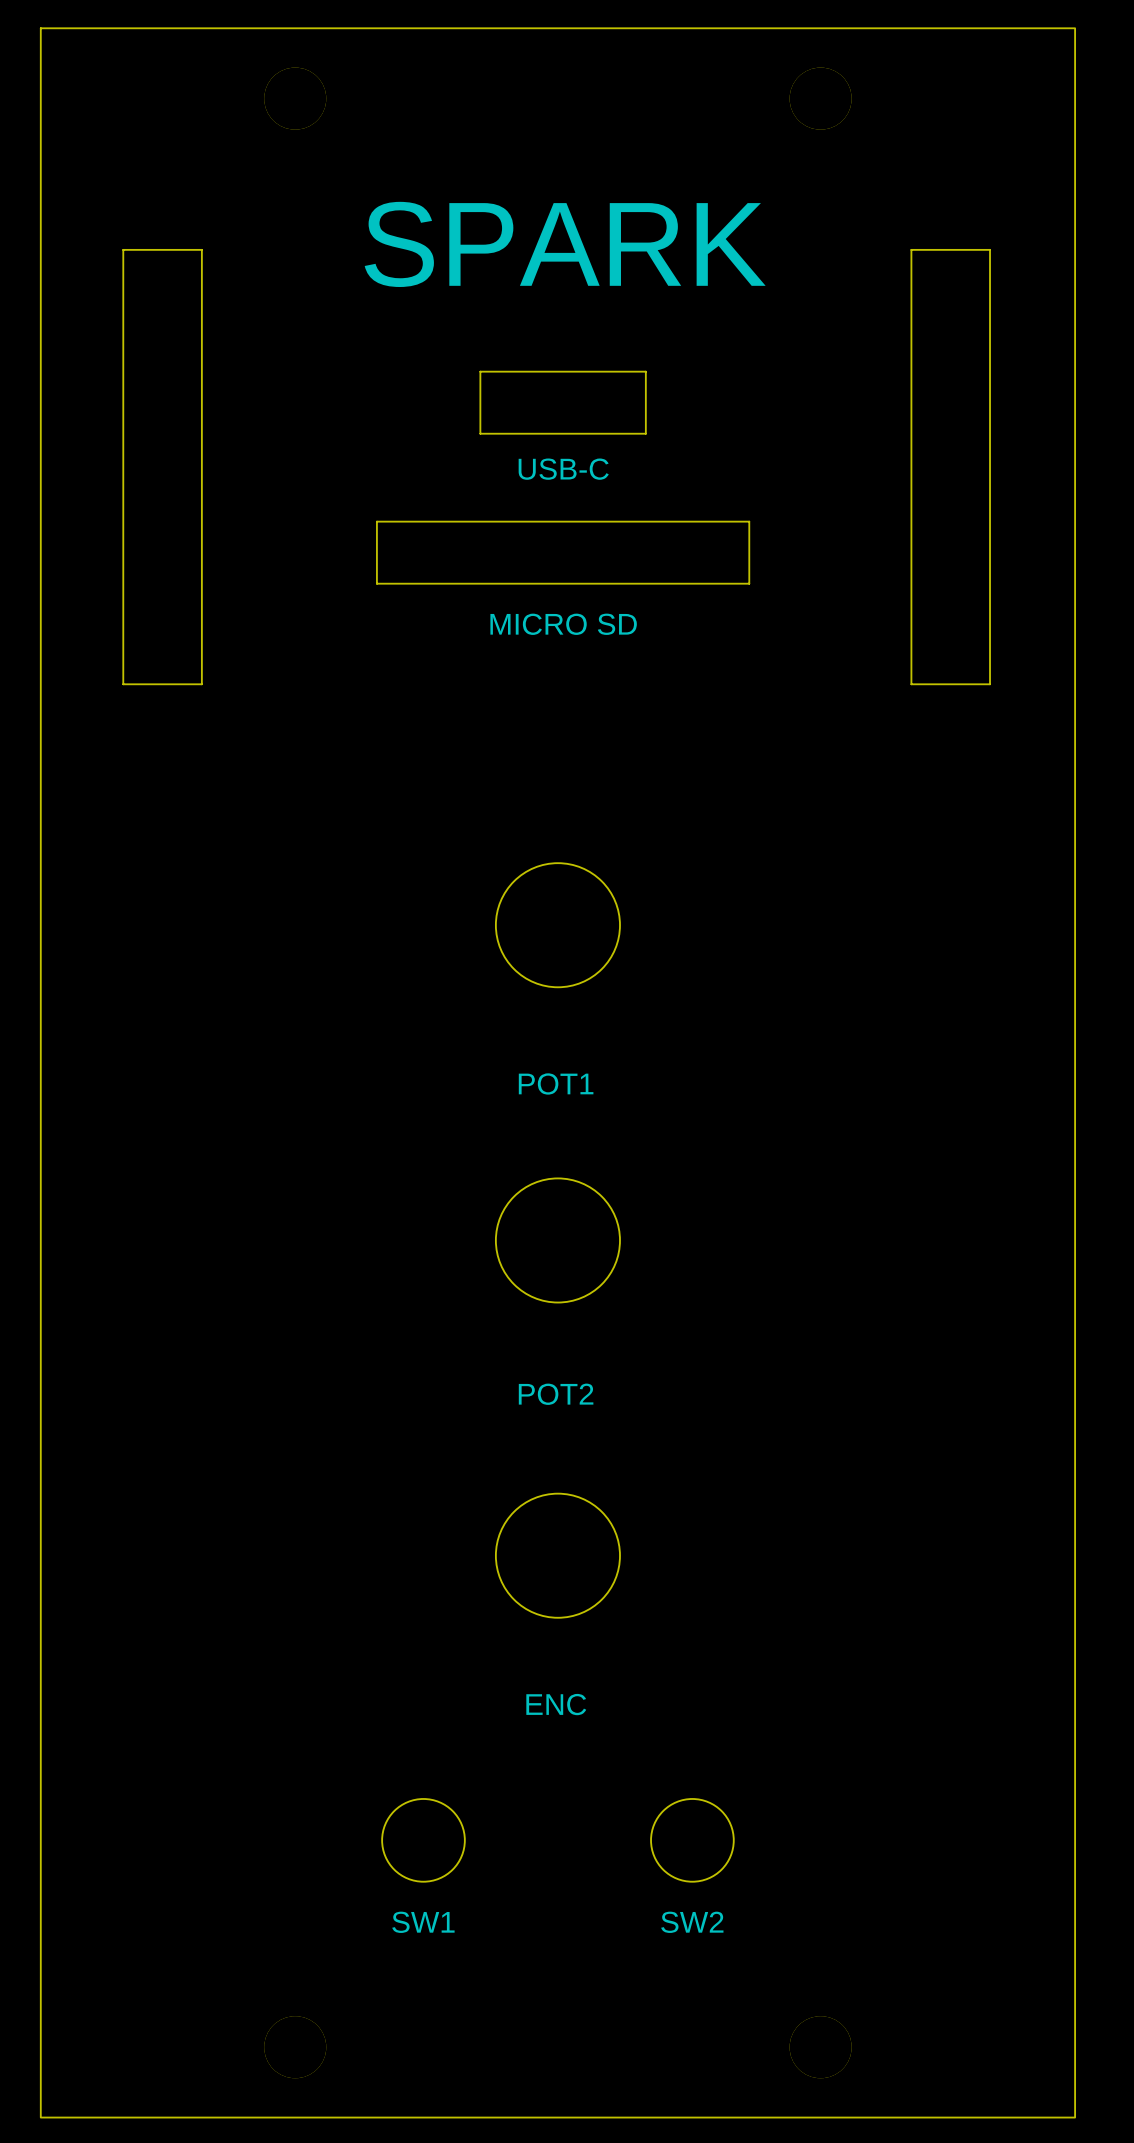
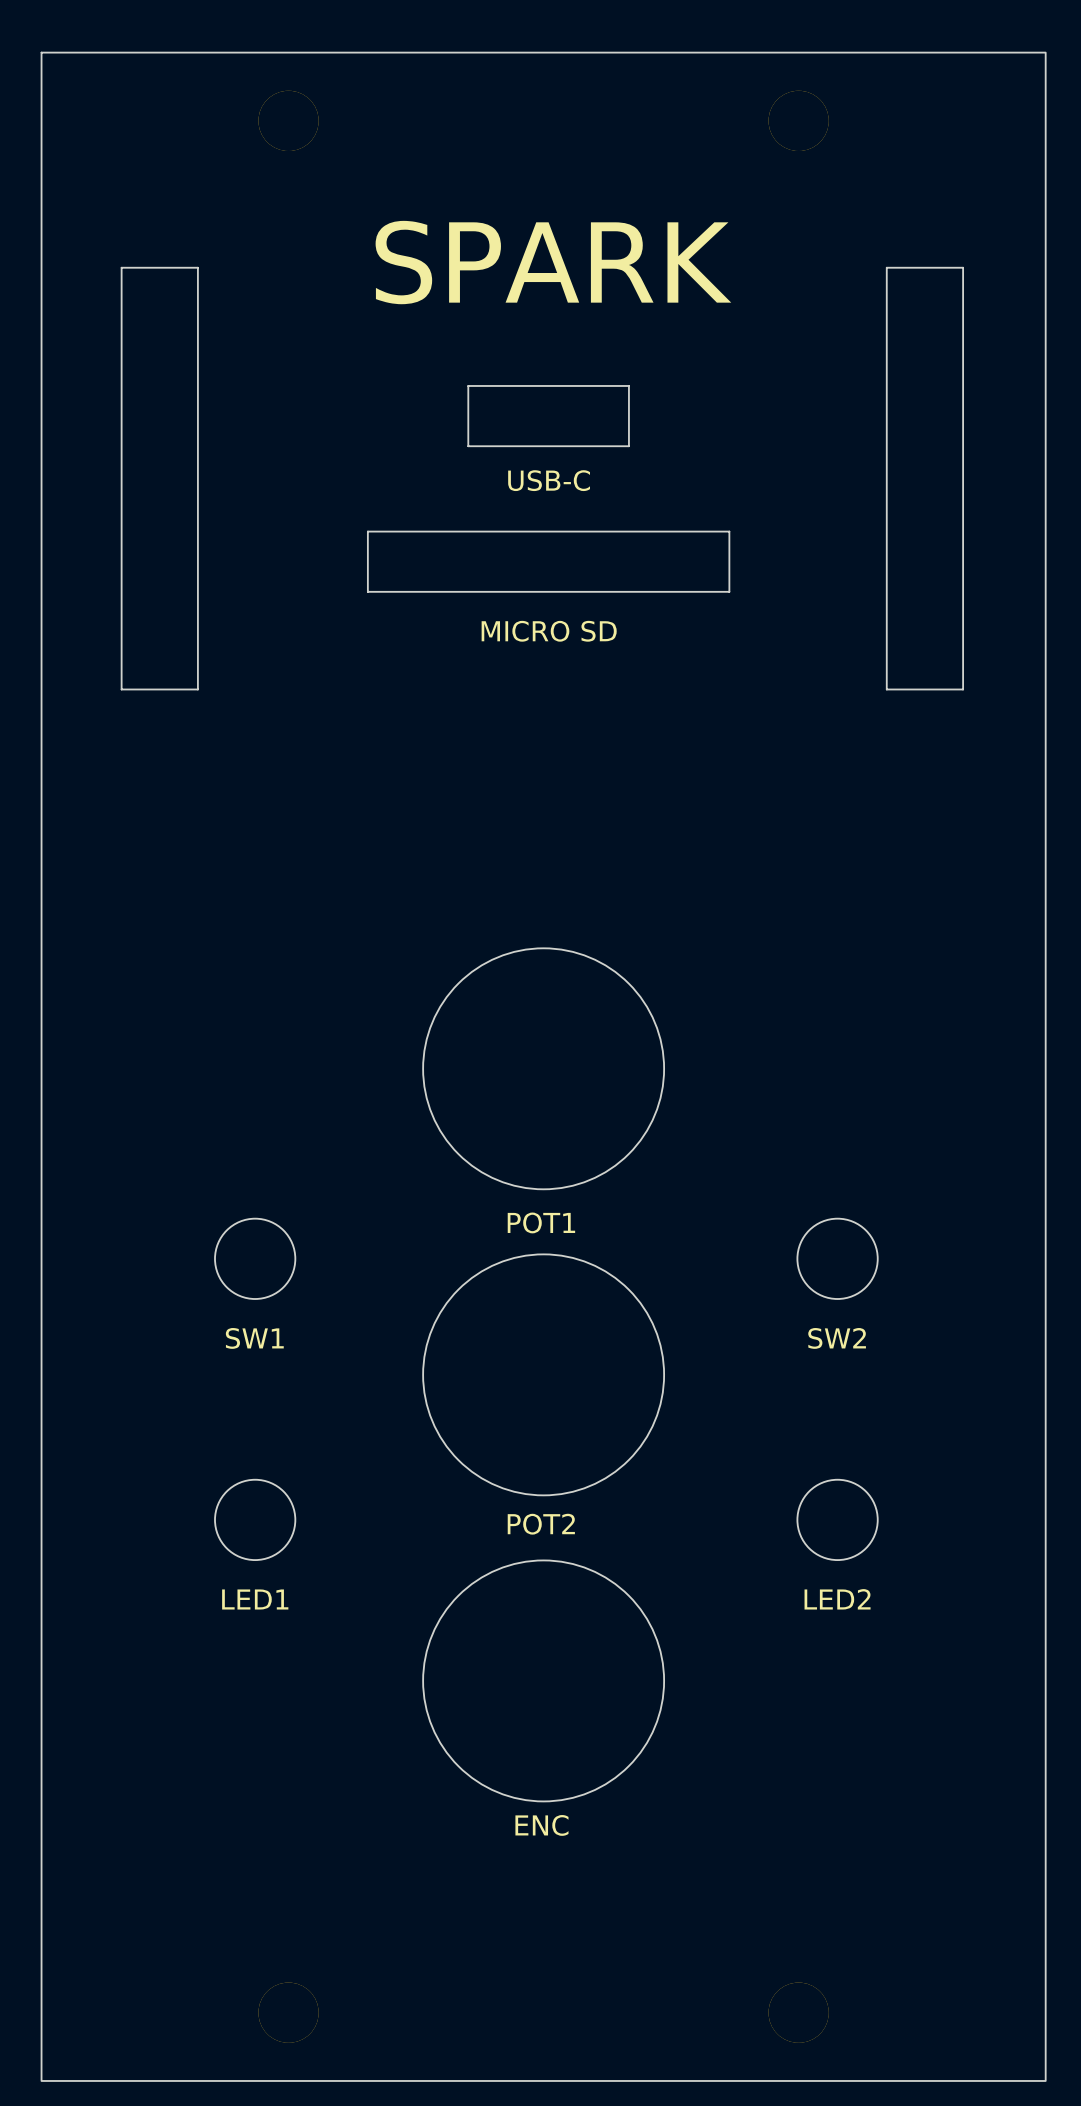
round board edge: [495, 862, 621, 988] -> none
round board edge: none -> [422, 947, 665, 1190]
text position: POT1 (556, 1083) -> POT1 (541, 1222)
round board edge: [495, 1178, 621, 1303] -> none
round board edge: none -> [214, 1218, 296, 1300]
round board edge: none -> [797, 1218, 879, 1300]
round board edge: none -> [422, 1253, 665, 1496]
text: none -> SW1 (254, 1338)
text: none -> SW2 (837, 1338)
text position: POT2 (556, 1394) -> POT2 (541, 1524)
round board edge: [495, 1493, 621, 1619] -> none
round board edge: none -> [214, 1479, 296, 1561]
round board edge: none -> [797, 1479, 879, 1561]
round board edge: none -> [422, 1560, 665, 1802]
text: none -> LED1 (255, 1599)
text: none -> LED2 (837, 1599)
text position: ENC (556, 1704) -> ENC (541, 1825)
round board edge: [381, 1798, 466, 1883] -> none
round board edge: [650, 1798, 735, 1883] -> none
text: SW1 (423, 1922) -> none
text: SW2 (692, 1922) -> none

